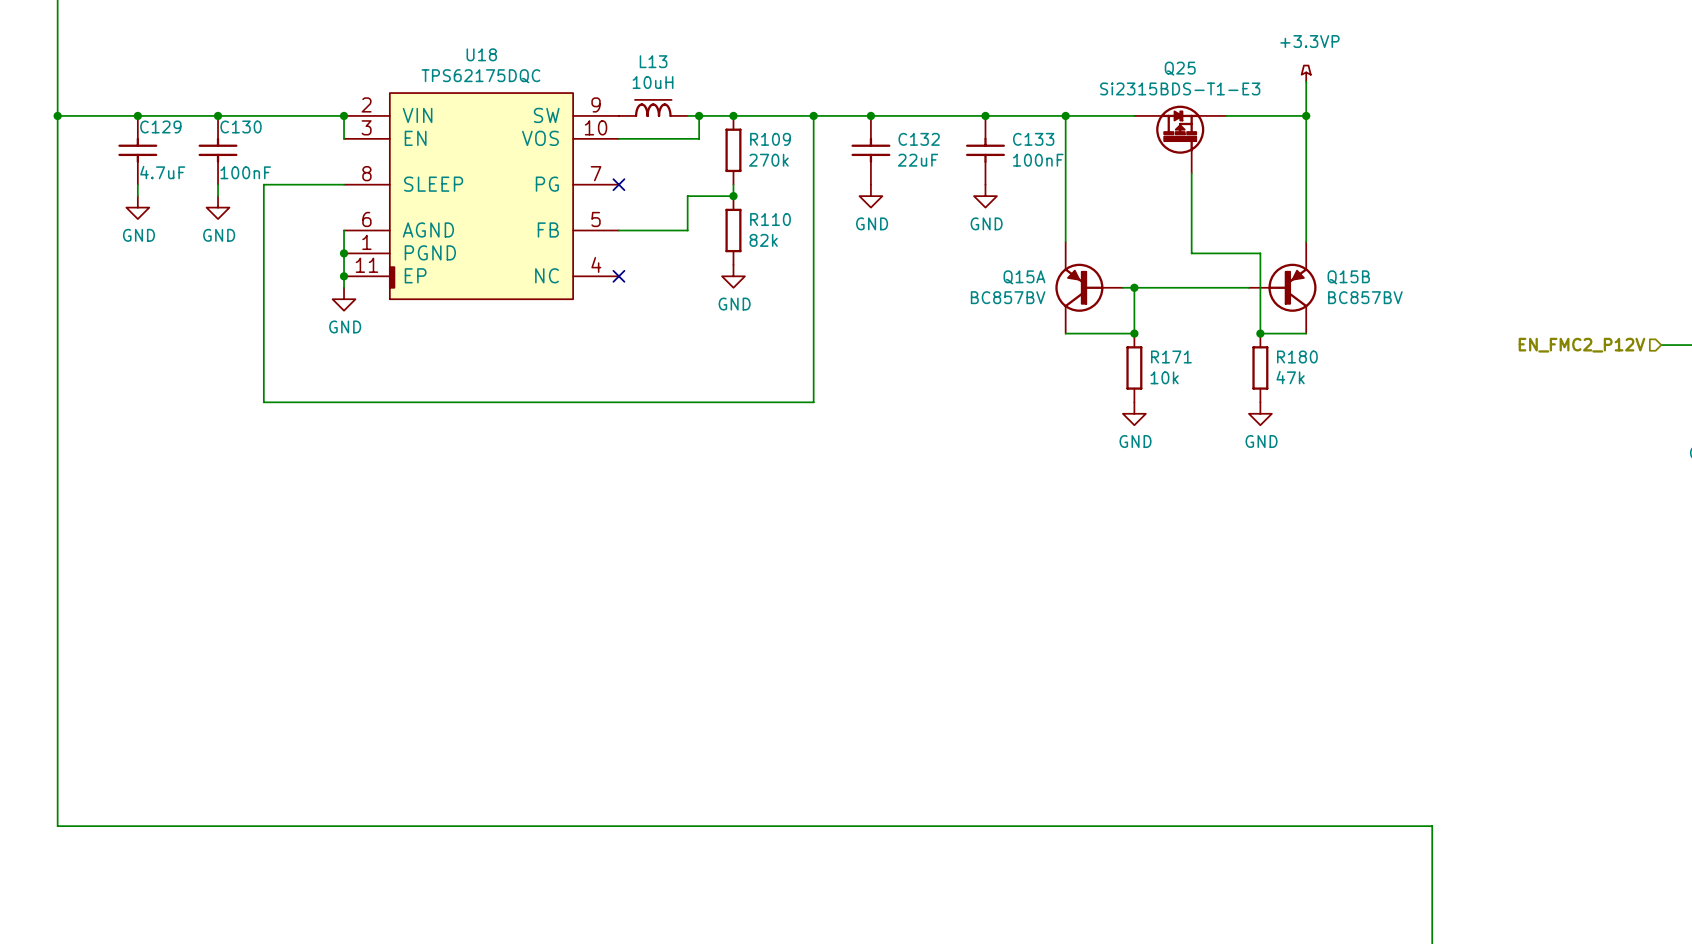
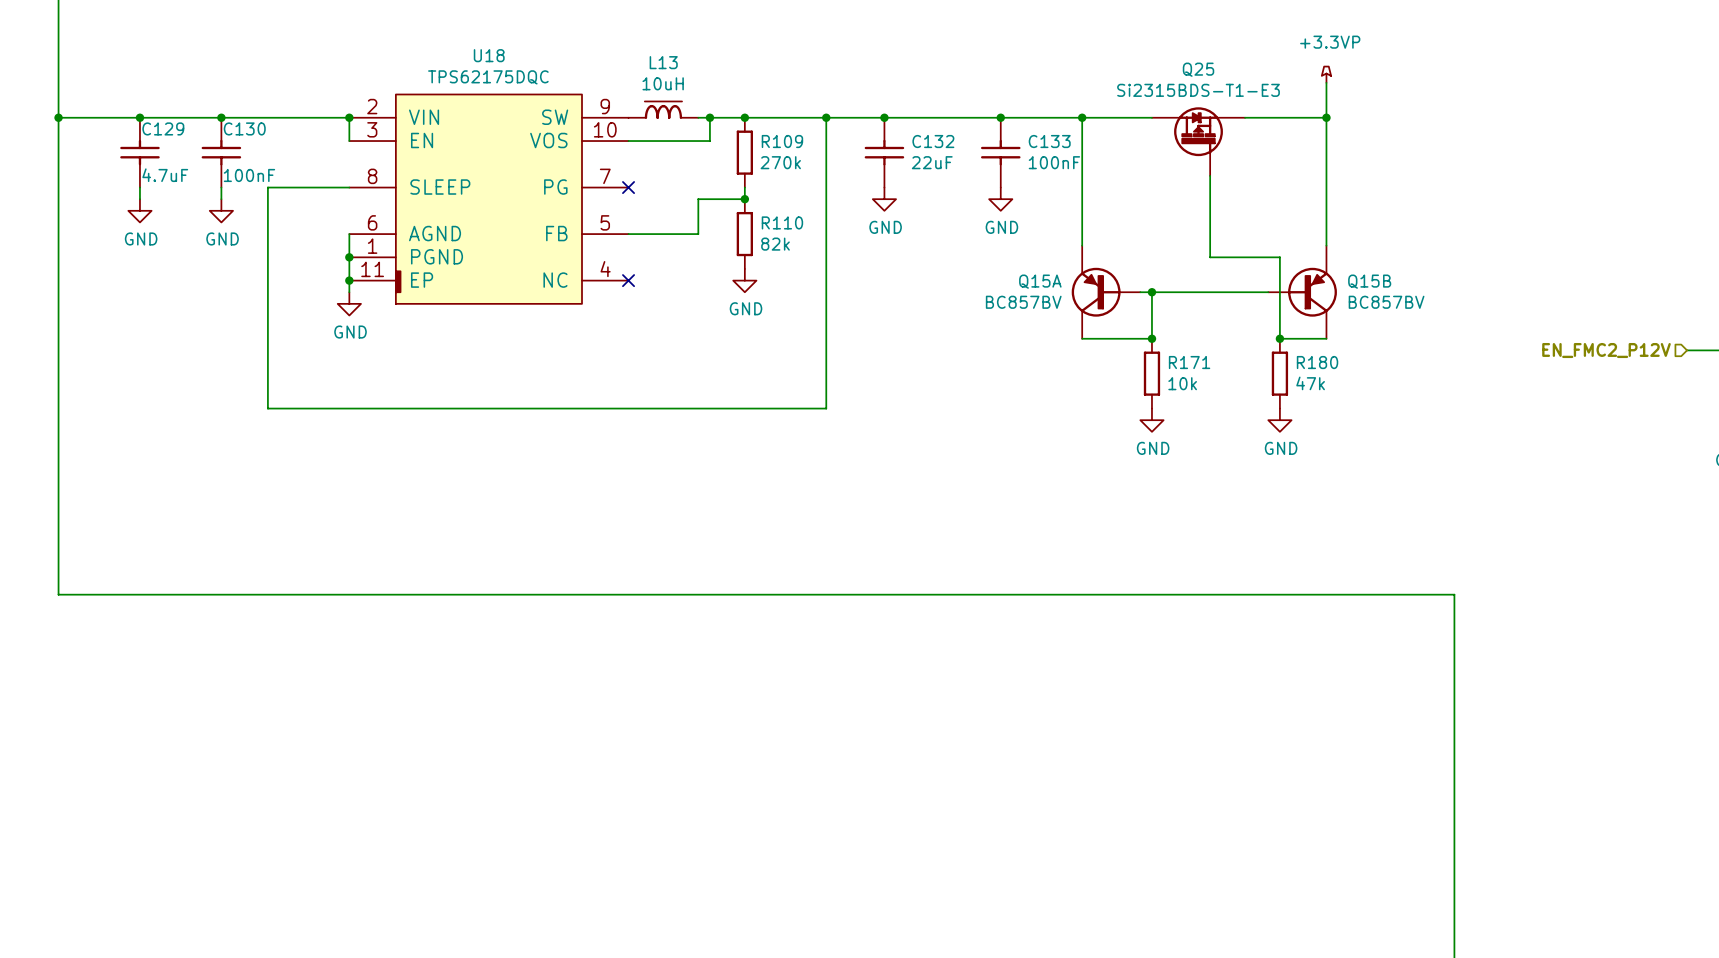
wire: (57, 585) (57, 826) (1432, 826) -> (58, 594) (1454, 594) (1454, 838)

